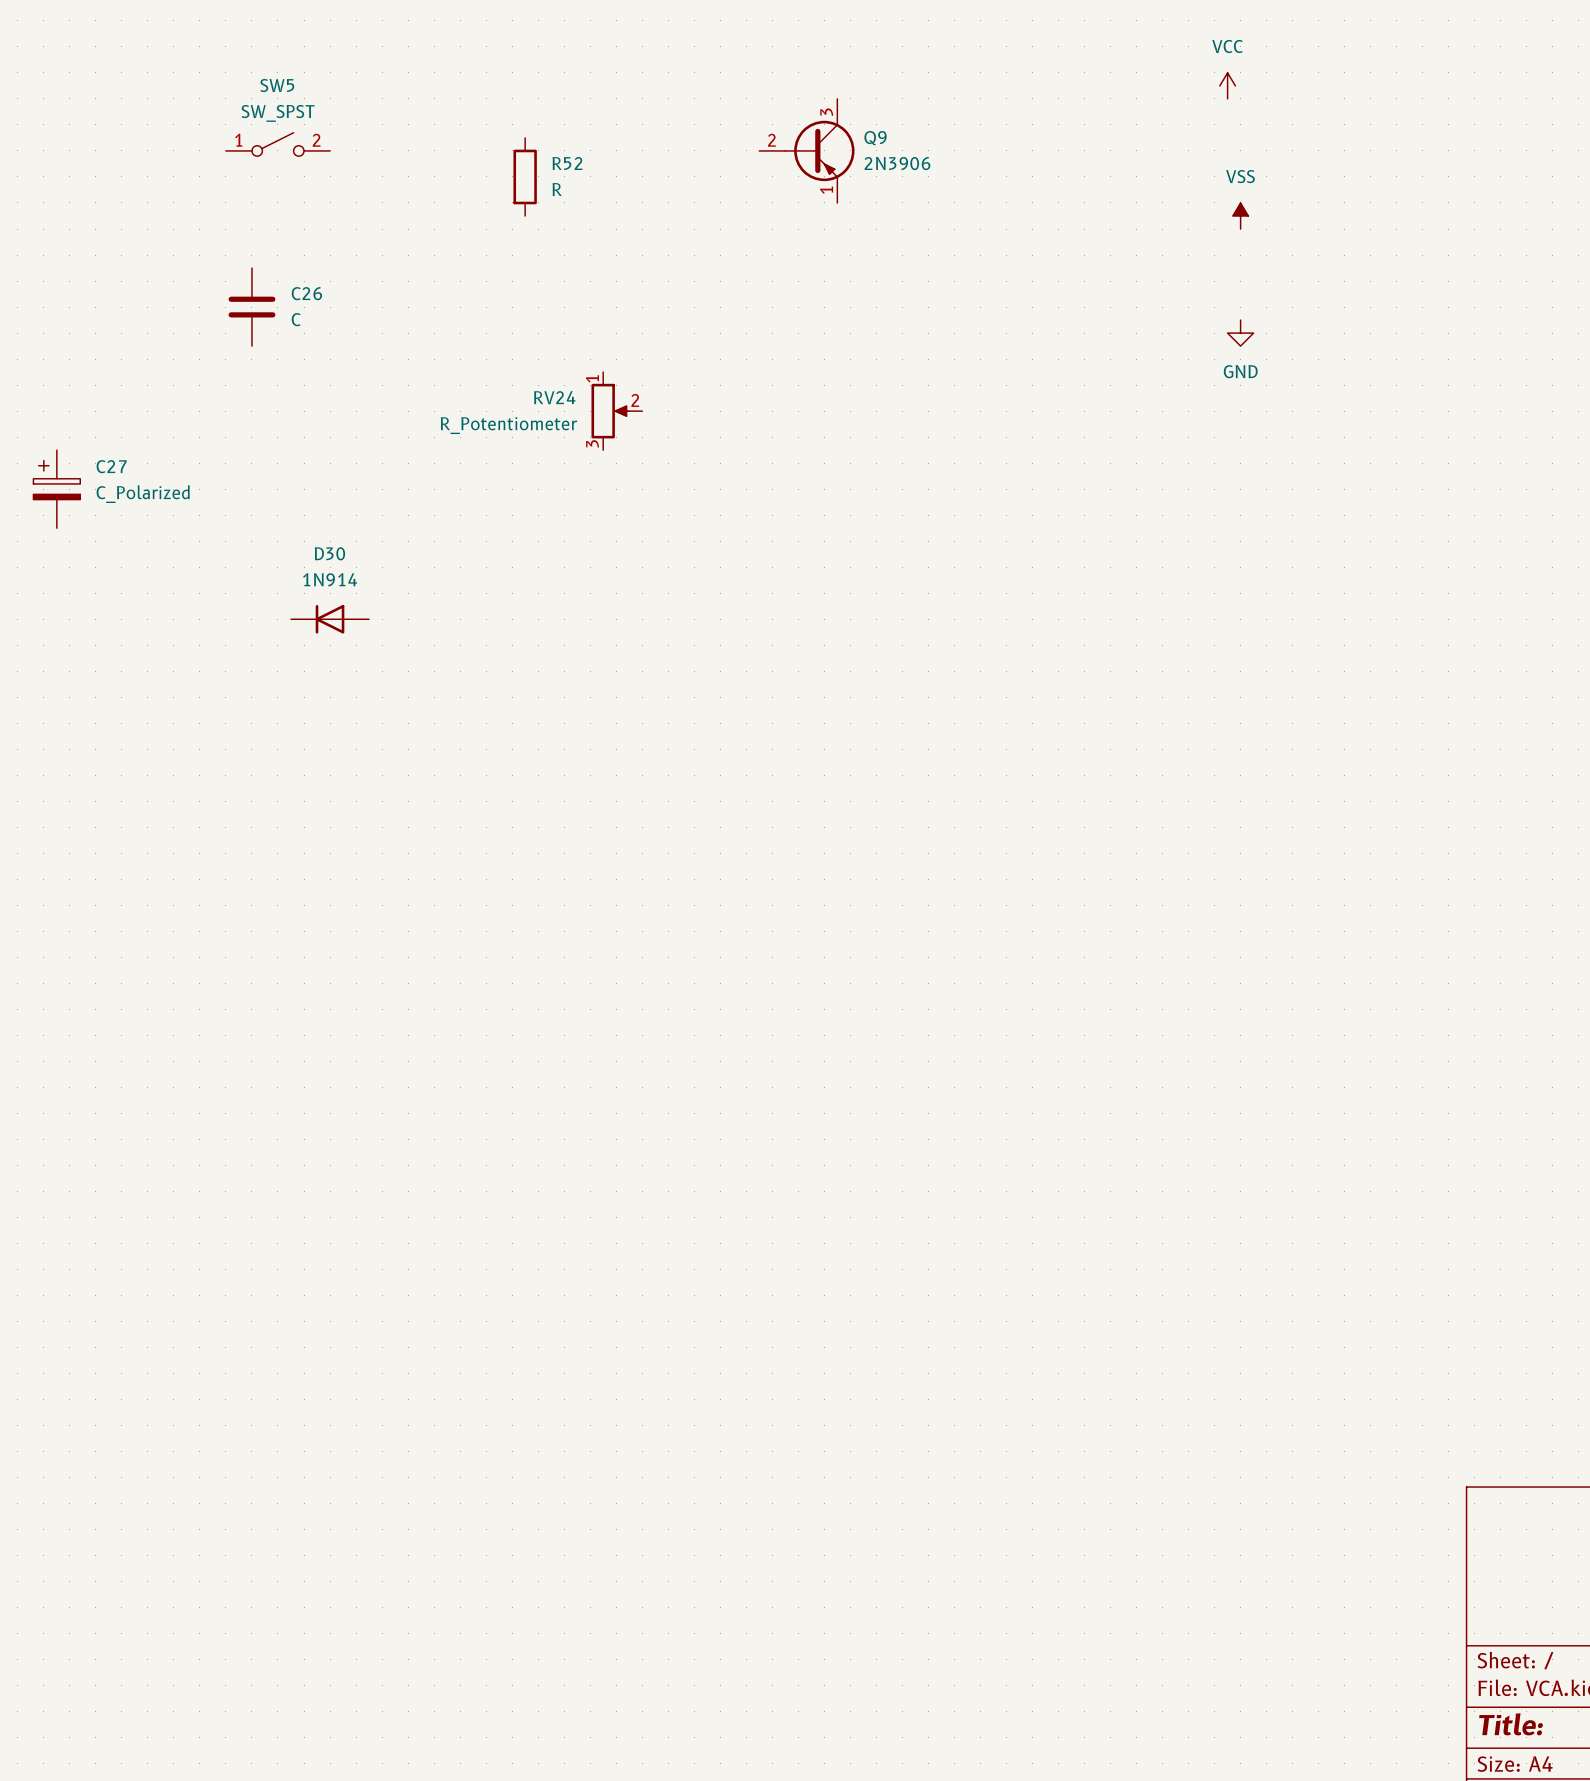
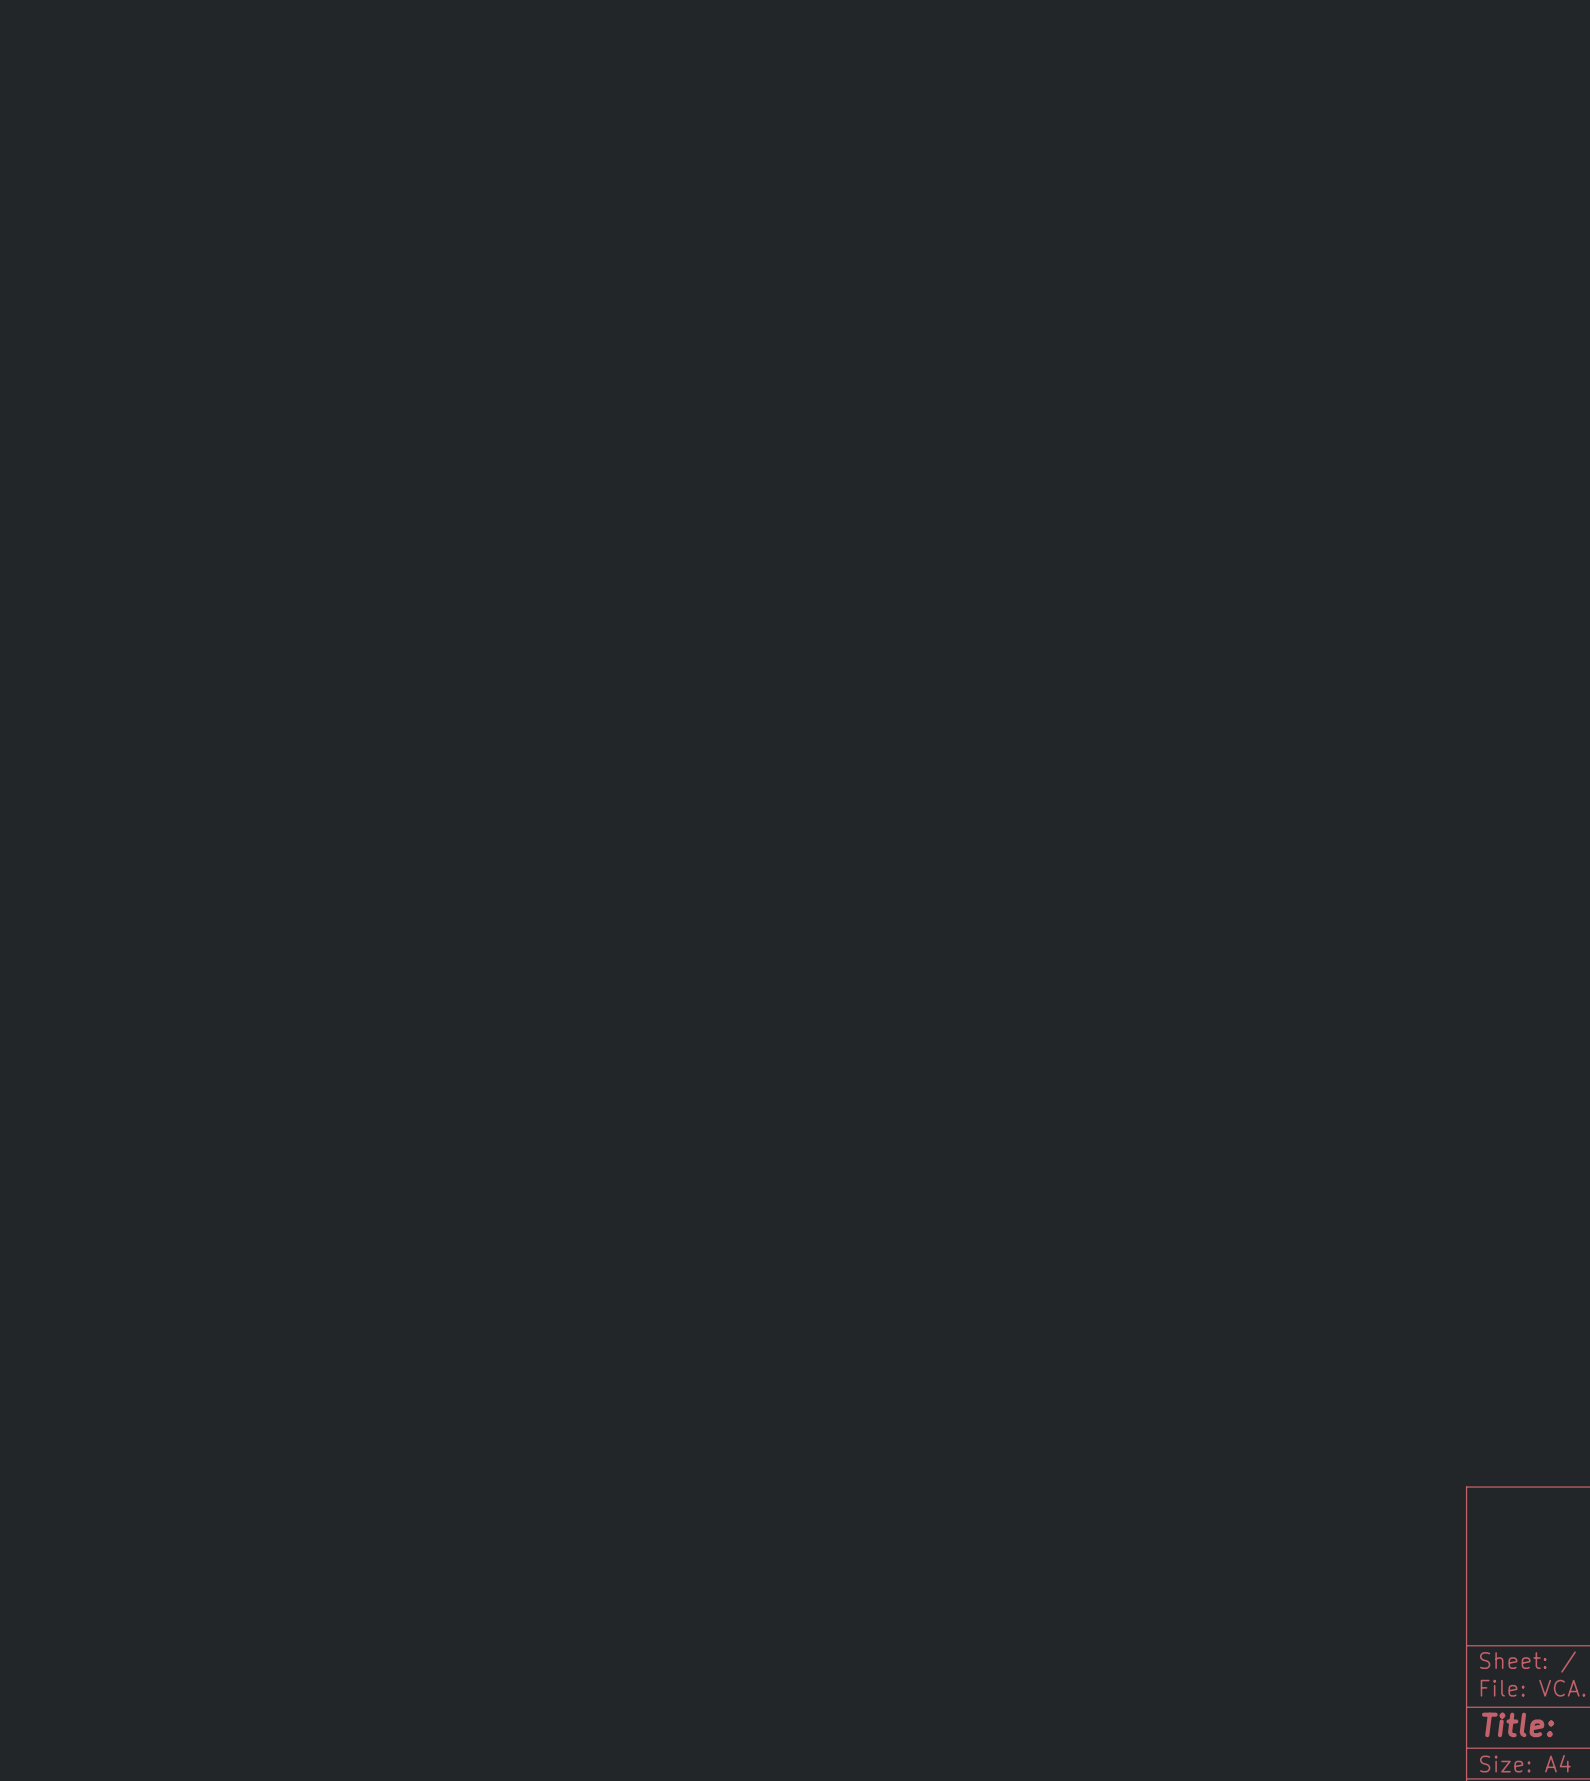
power symbol: VCC (1227, 85) -> none
SW5: SW_SPST (277, 144) -> none
Q9: 2N3906 (806, 150) -> none
R52: R (525, 176) -> none
power symbol: VSS (1240, 216) -> none
C26: C (251, 307) -> none
power symbol: GND (1240, 333) -> none
RV24: R_Potentiometer (616, 411) -> none
C27: C_Polarized (56, 489) -> none
D30: 1N914 (330, 619) -> none

